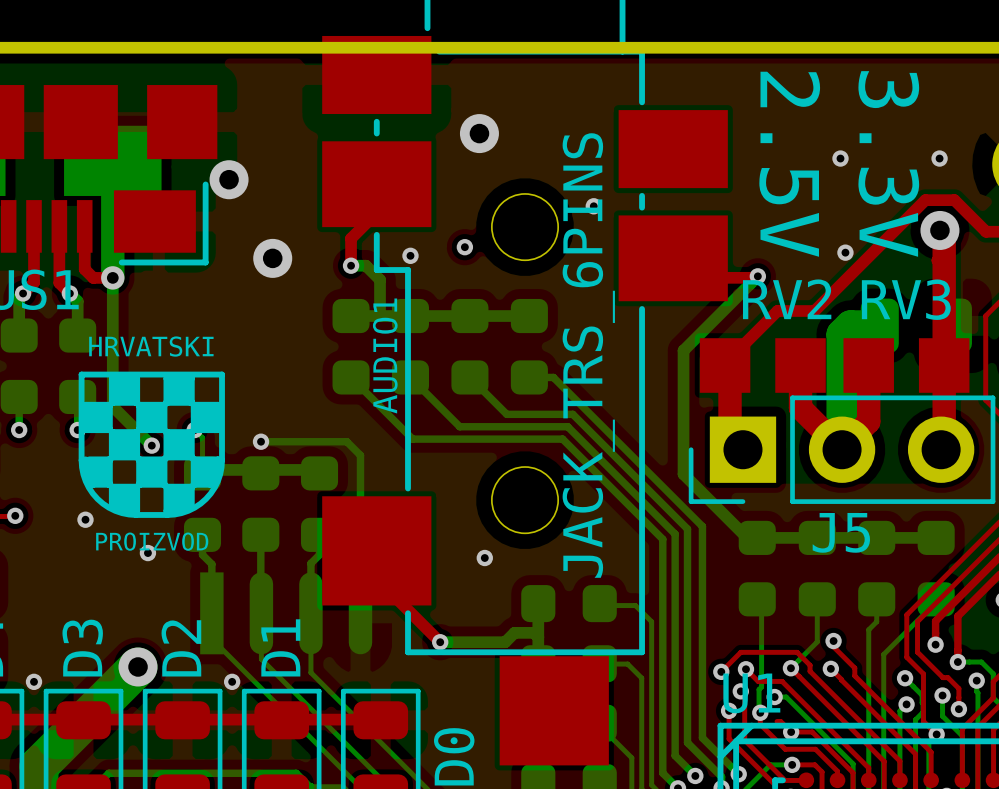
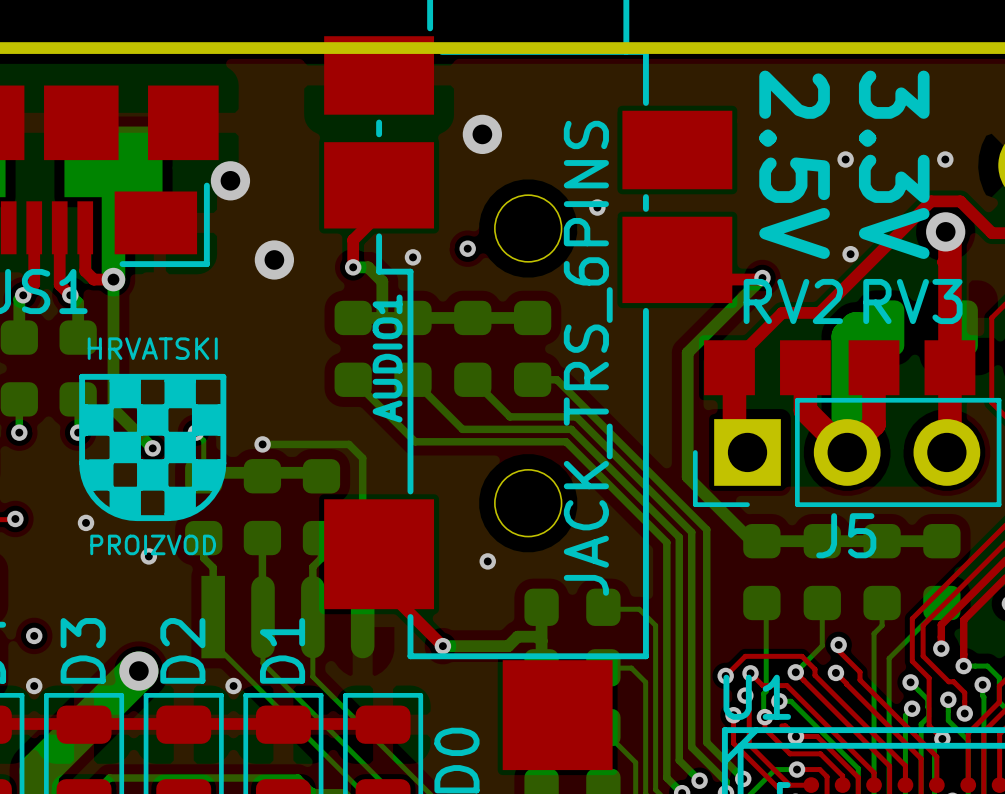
via: none -> (34, 635)

